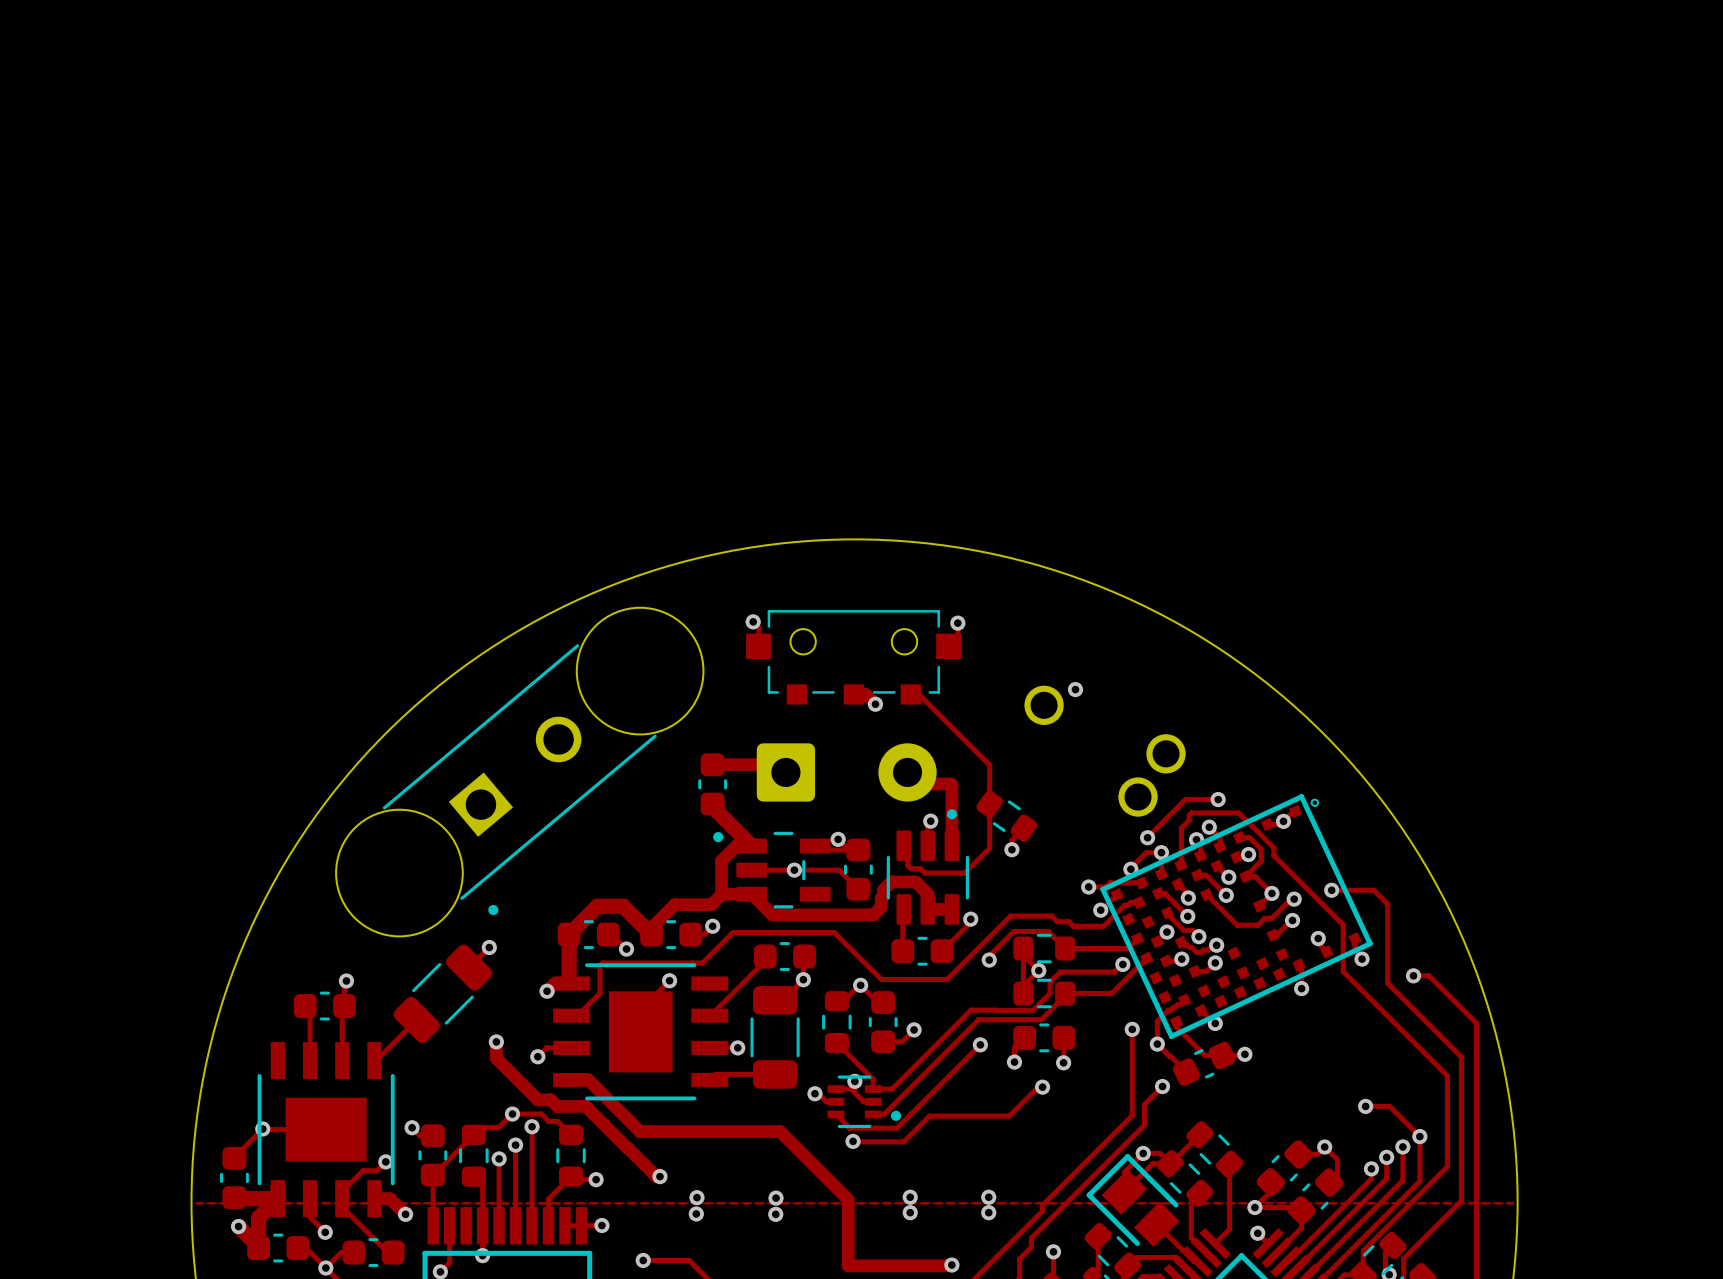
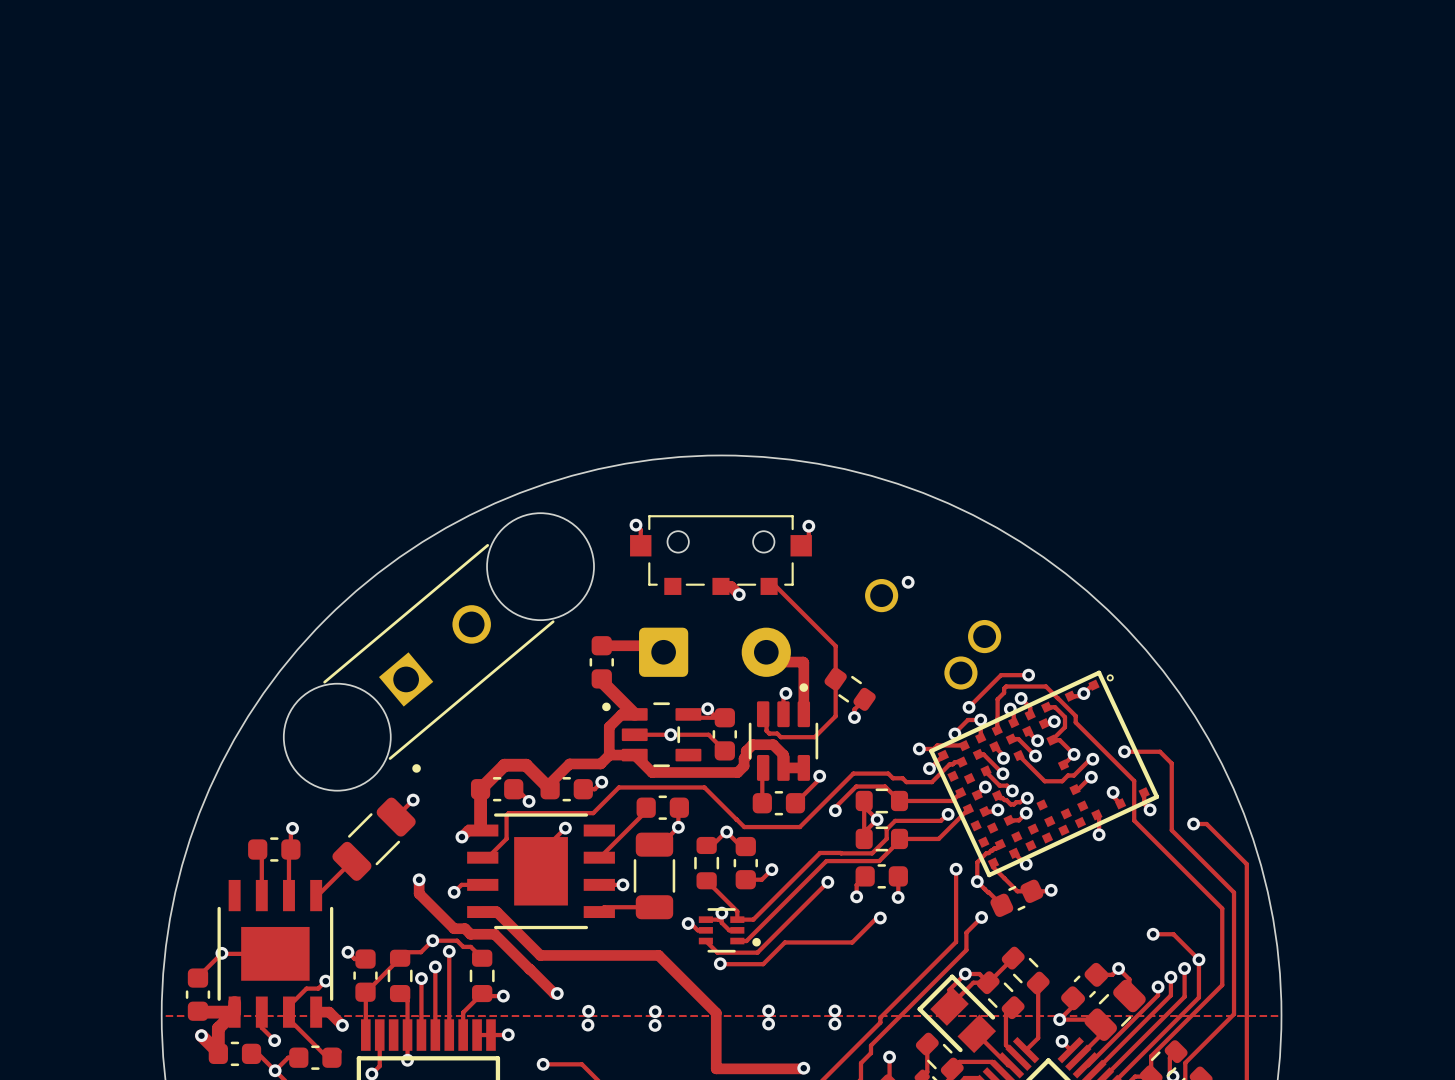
part footprint: [1287, 1168, 1344, 1225] -> [1084, 979, 1146, 1042]

